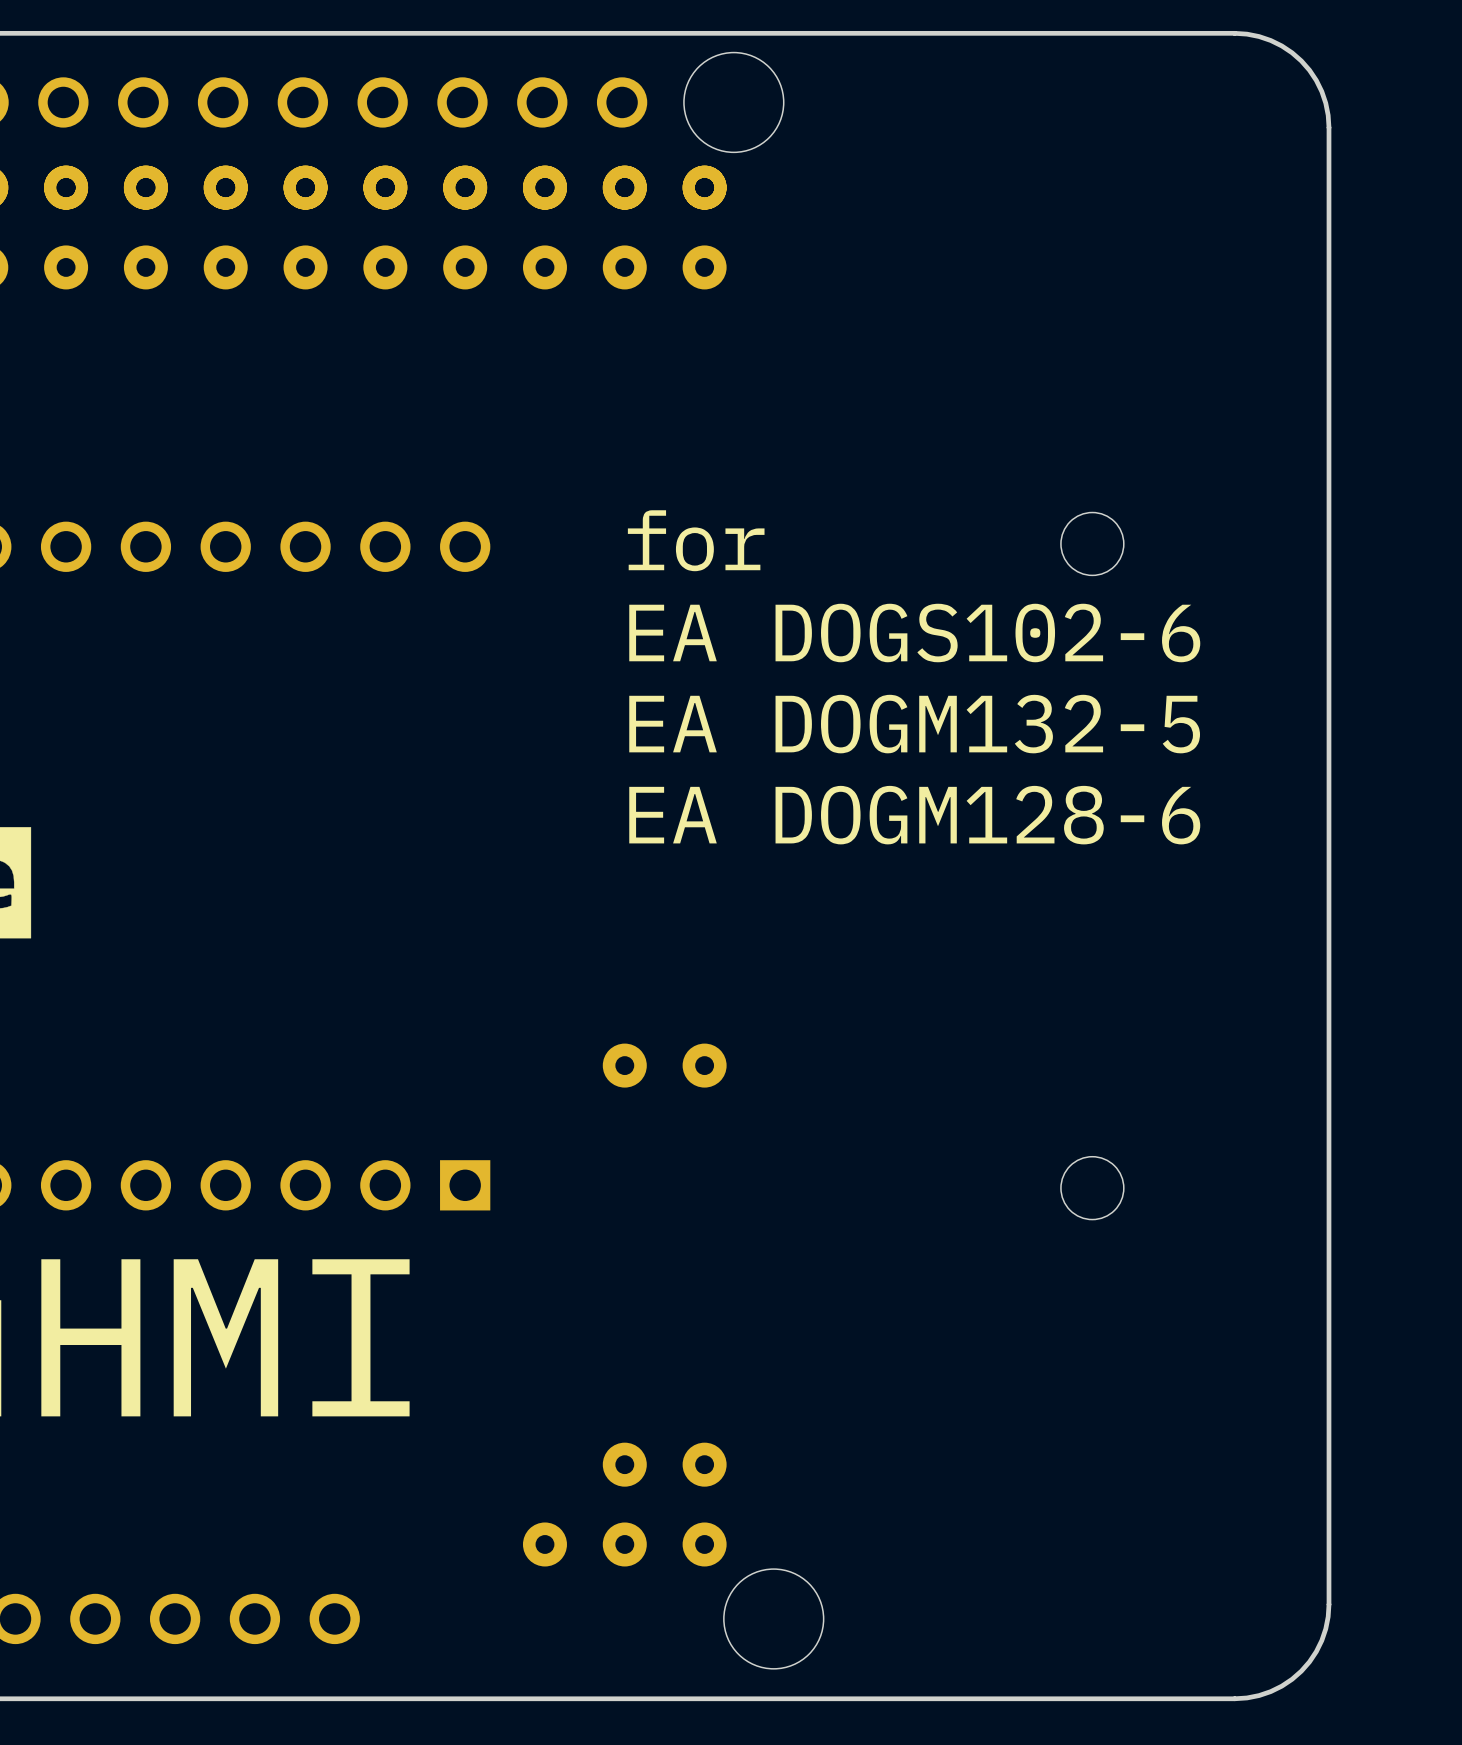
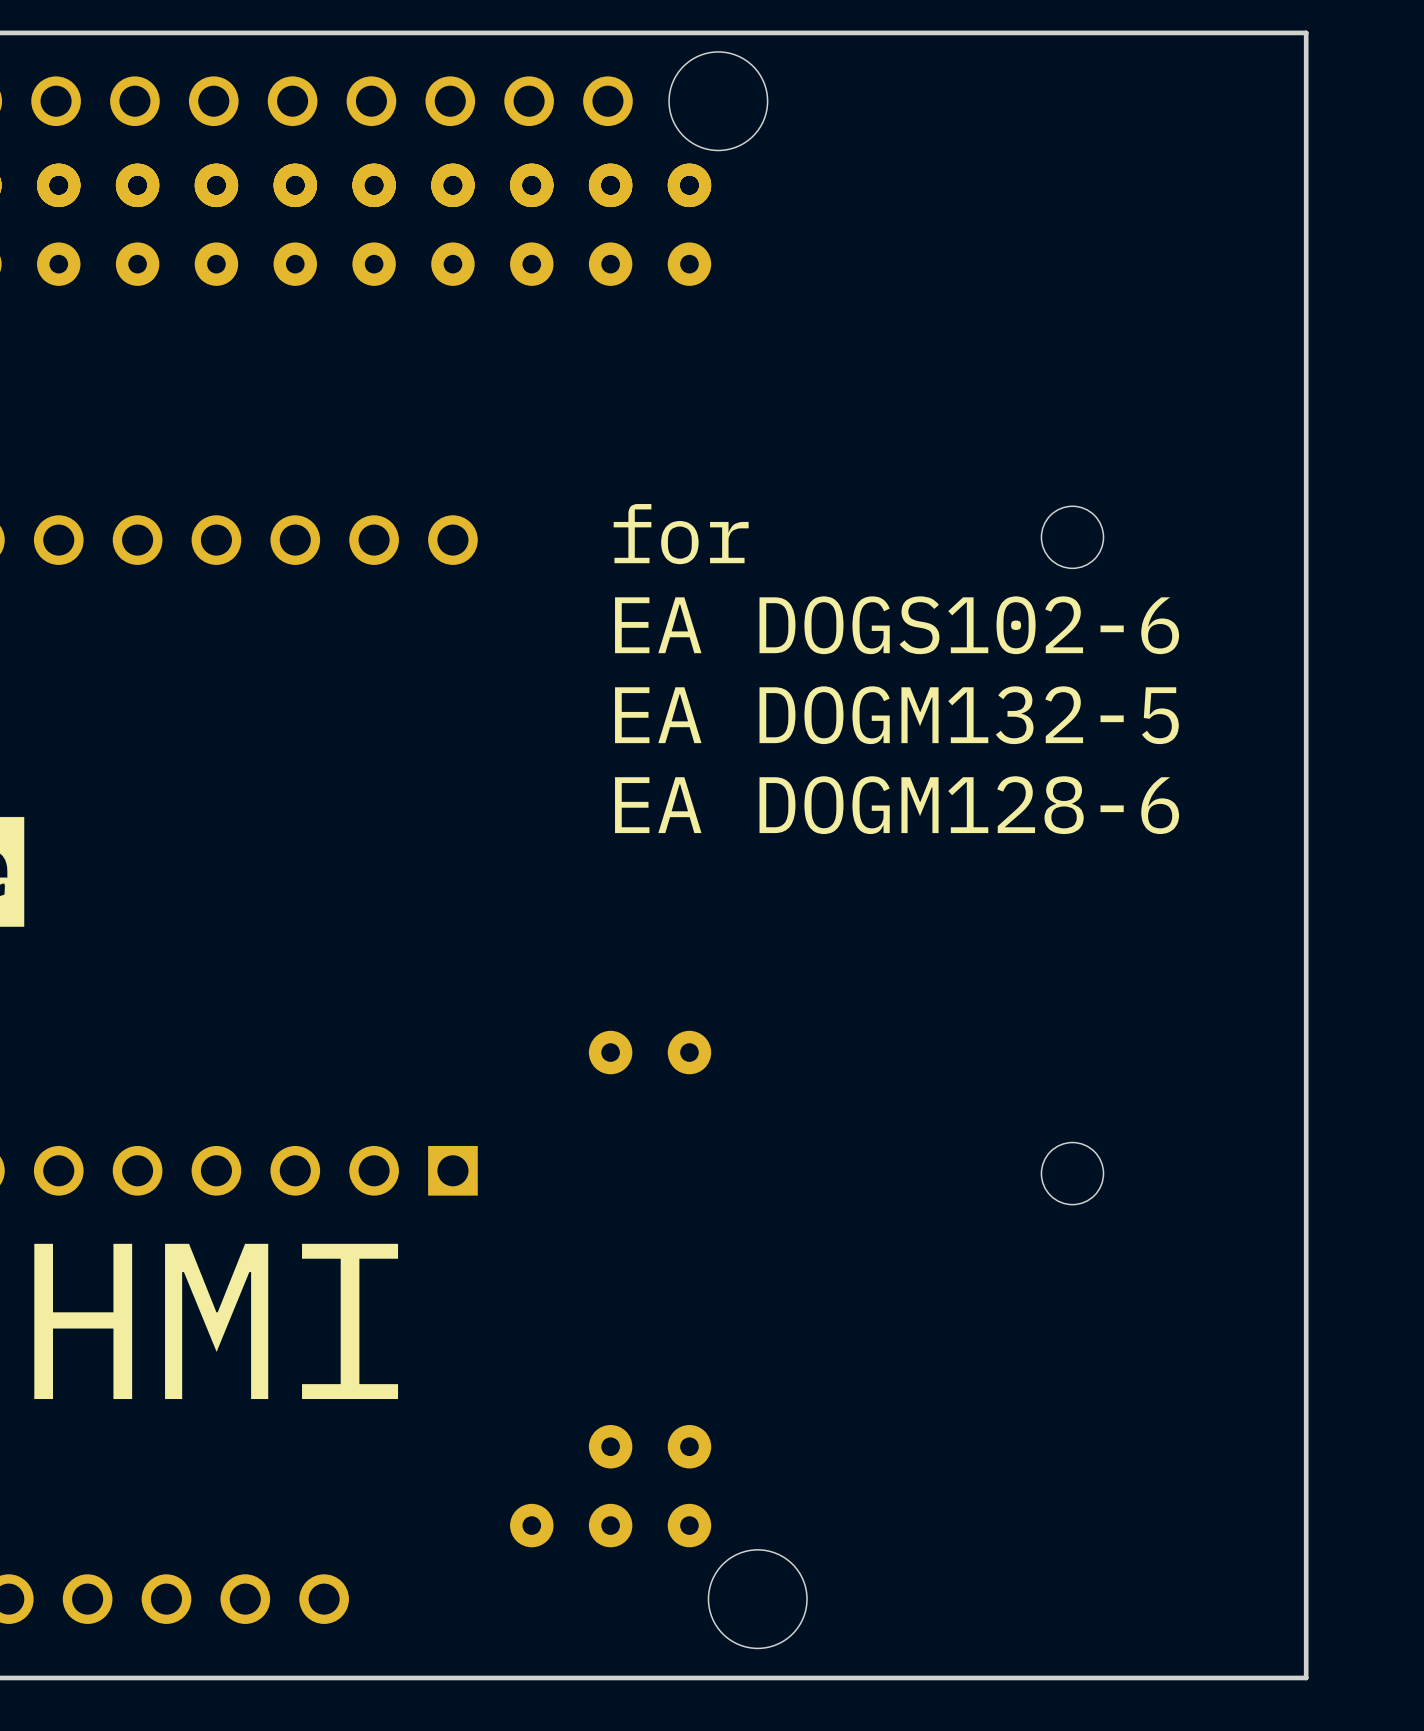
board edge: (1234, 33) (1247, 34) (1270, 40) (1281, 45) (1301, 60) (1316, 80) (1321, 91) (1325, 103) (1328, 127) -> (1213, 32) (1306, 32) (1306, 126)
board edge: (1328, 1604) (1325, 1628) (1321, 1640) (1309, 1661) (1301, 1671) (1292, 1679) (1270, 1691) (1247, 1697) (1234, 1698) -> (1306, 1584) (1306, 1677) (1213, 1677)

